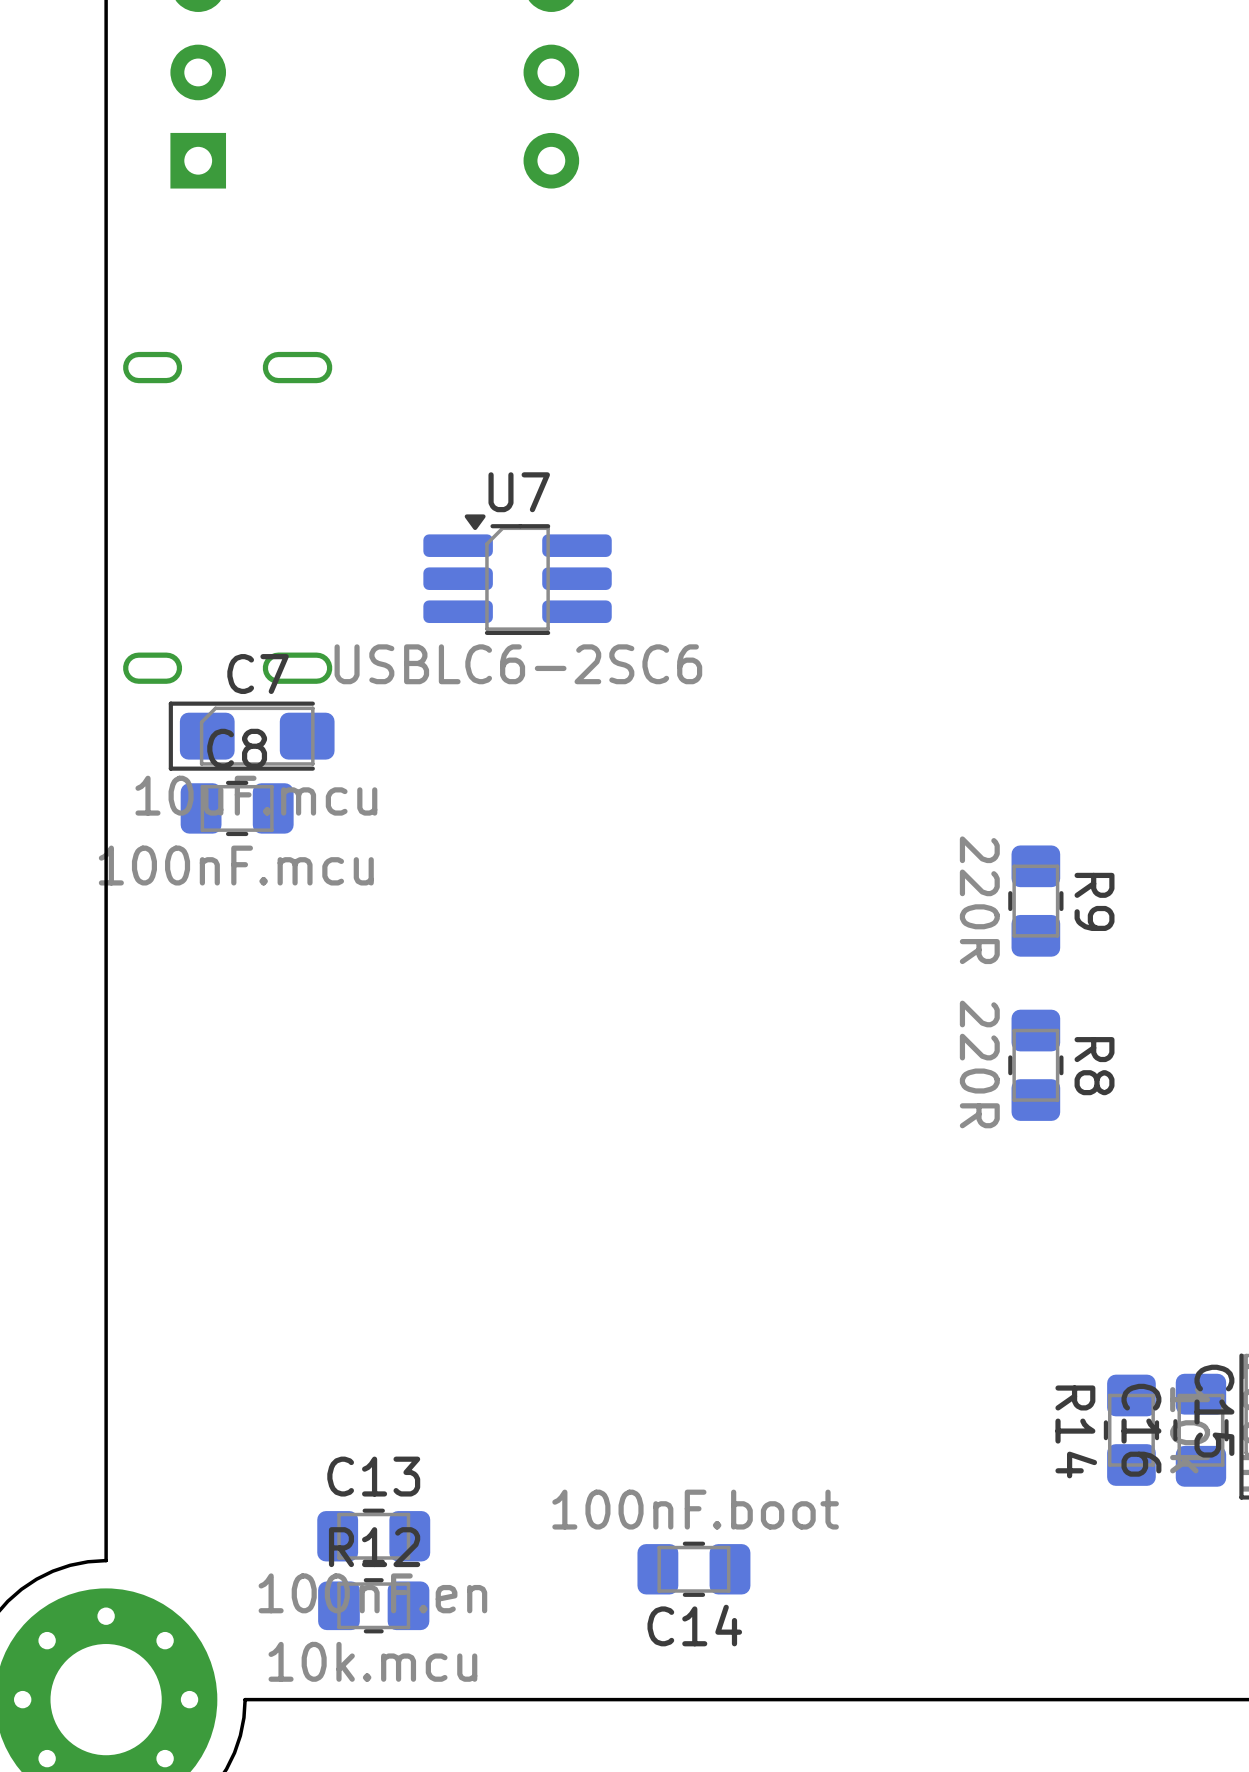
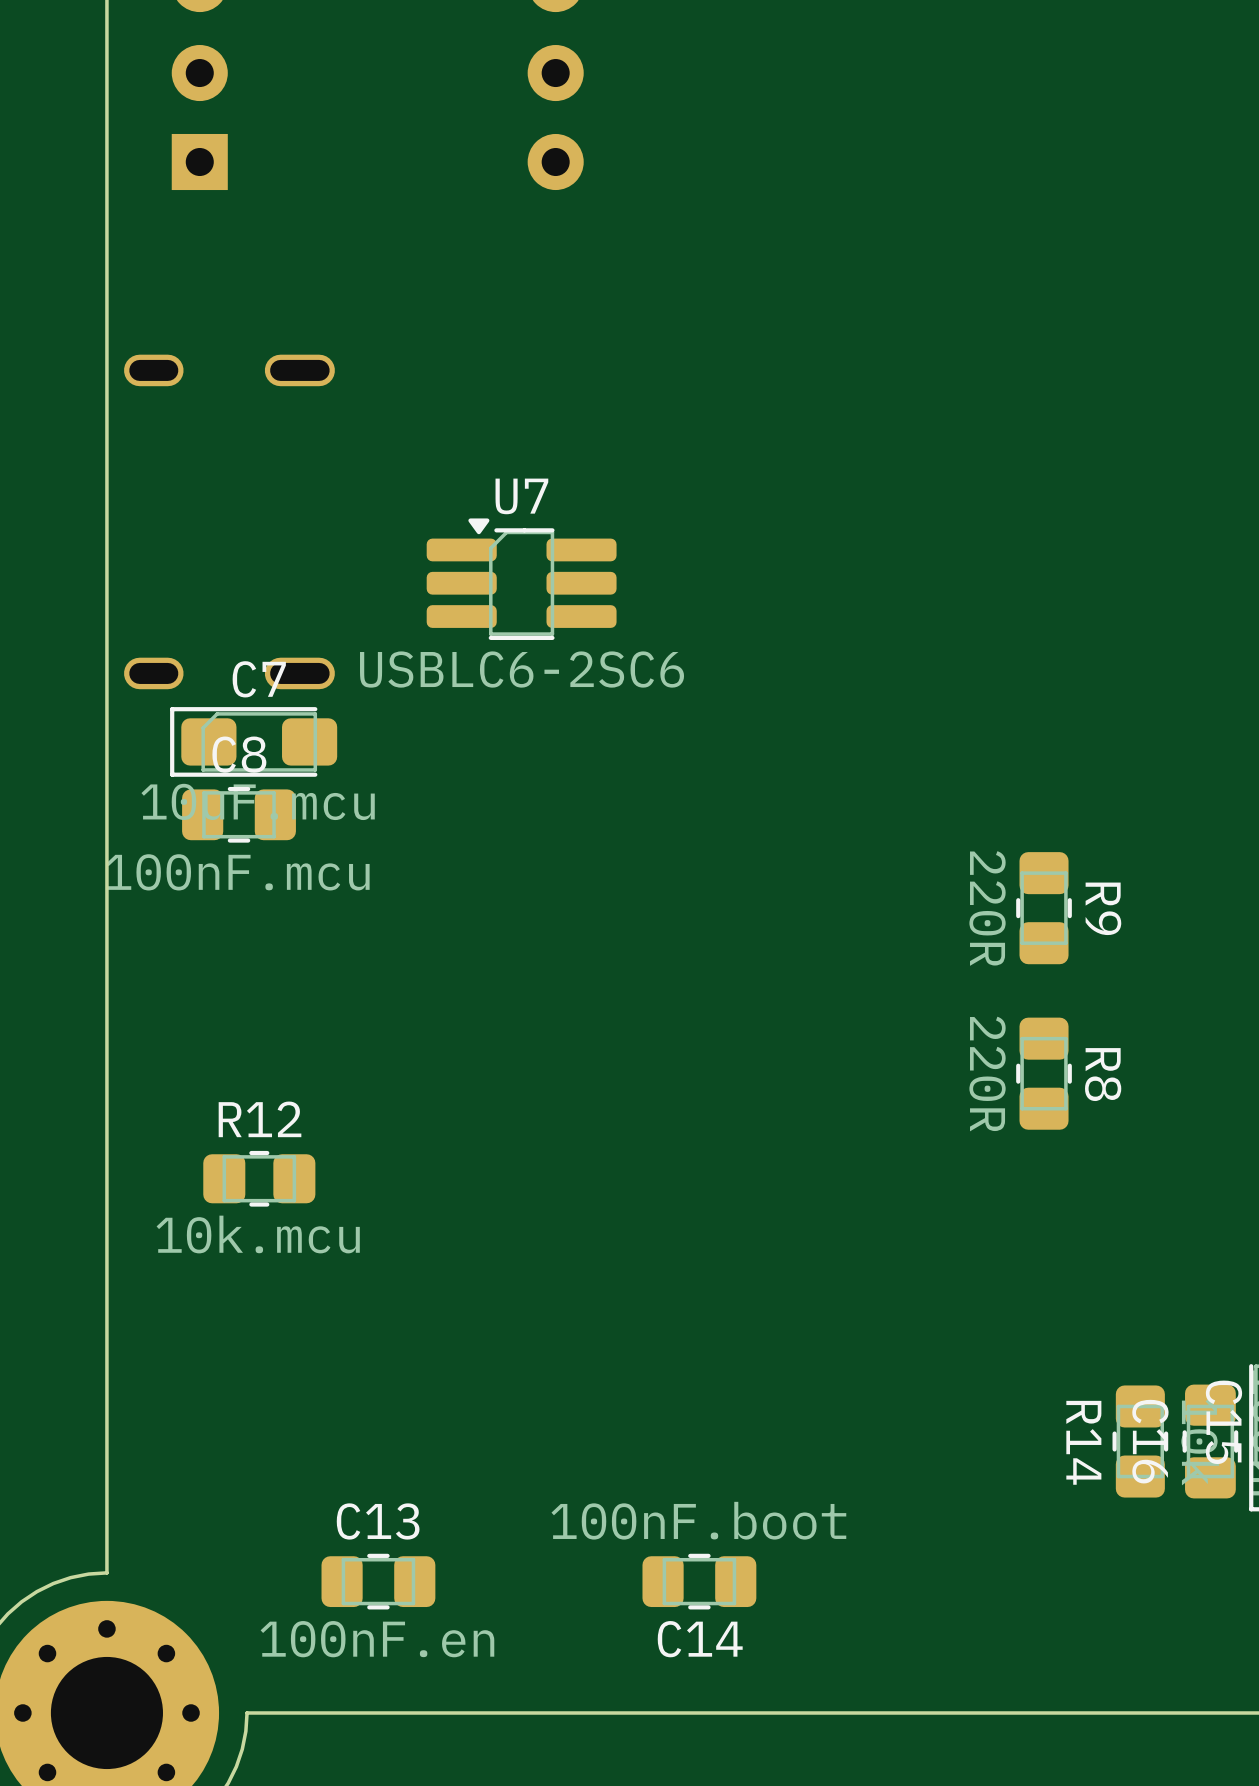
C13 position: (373, 1536) -> (378, 1581)
R12 position: (373, 1605) -> (259, 1178)

